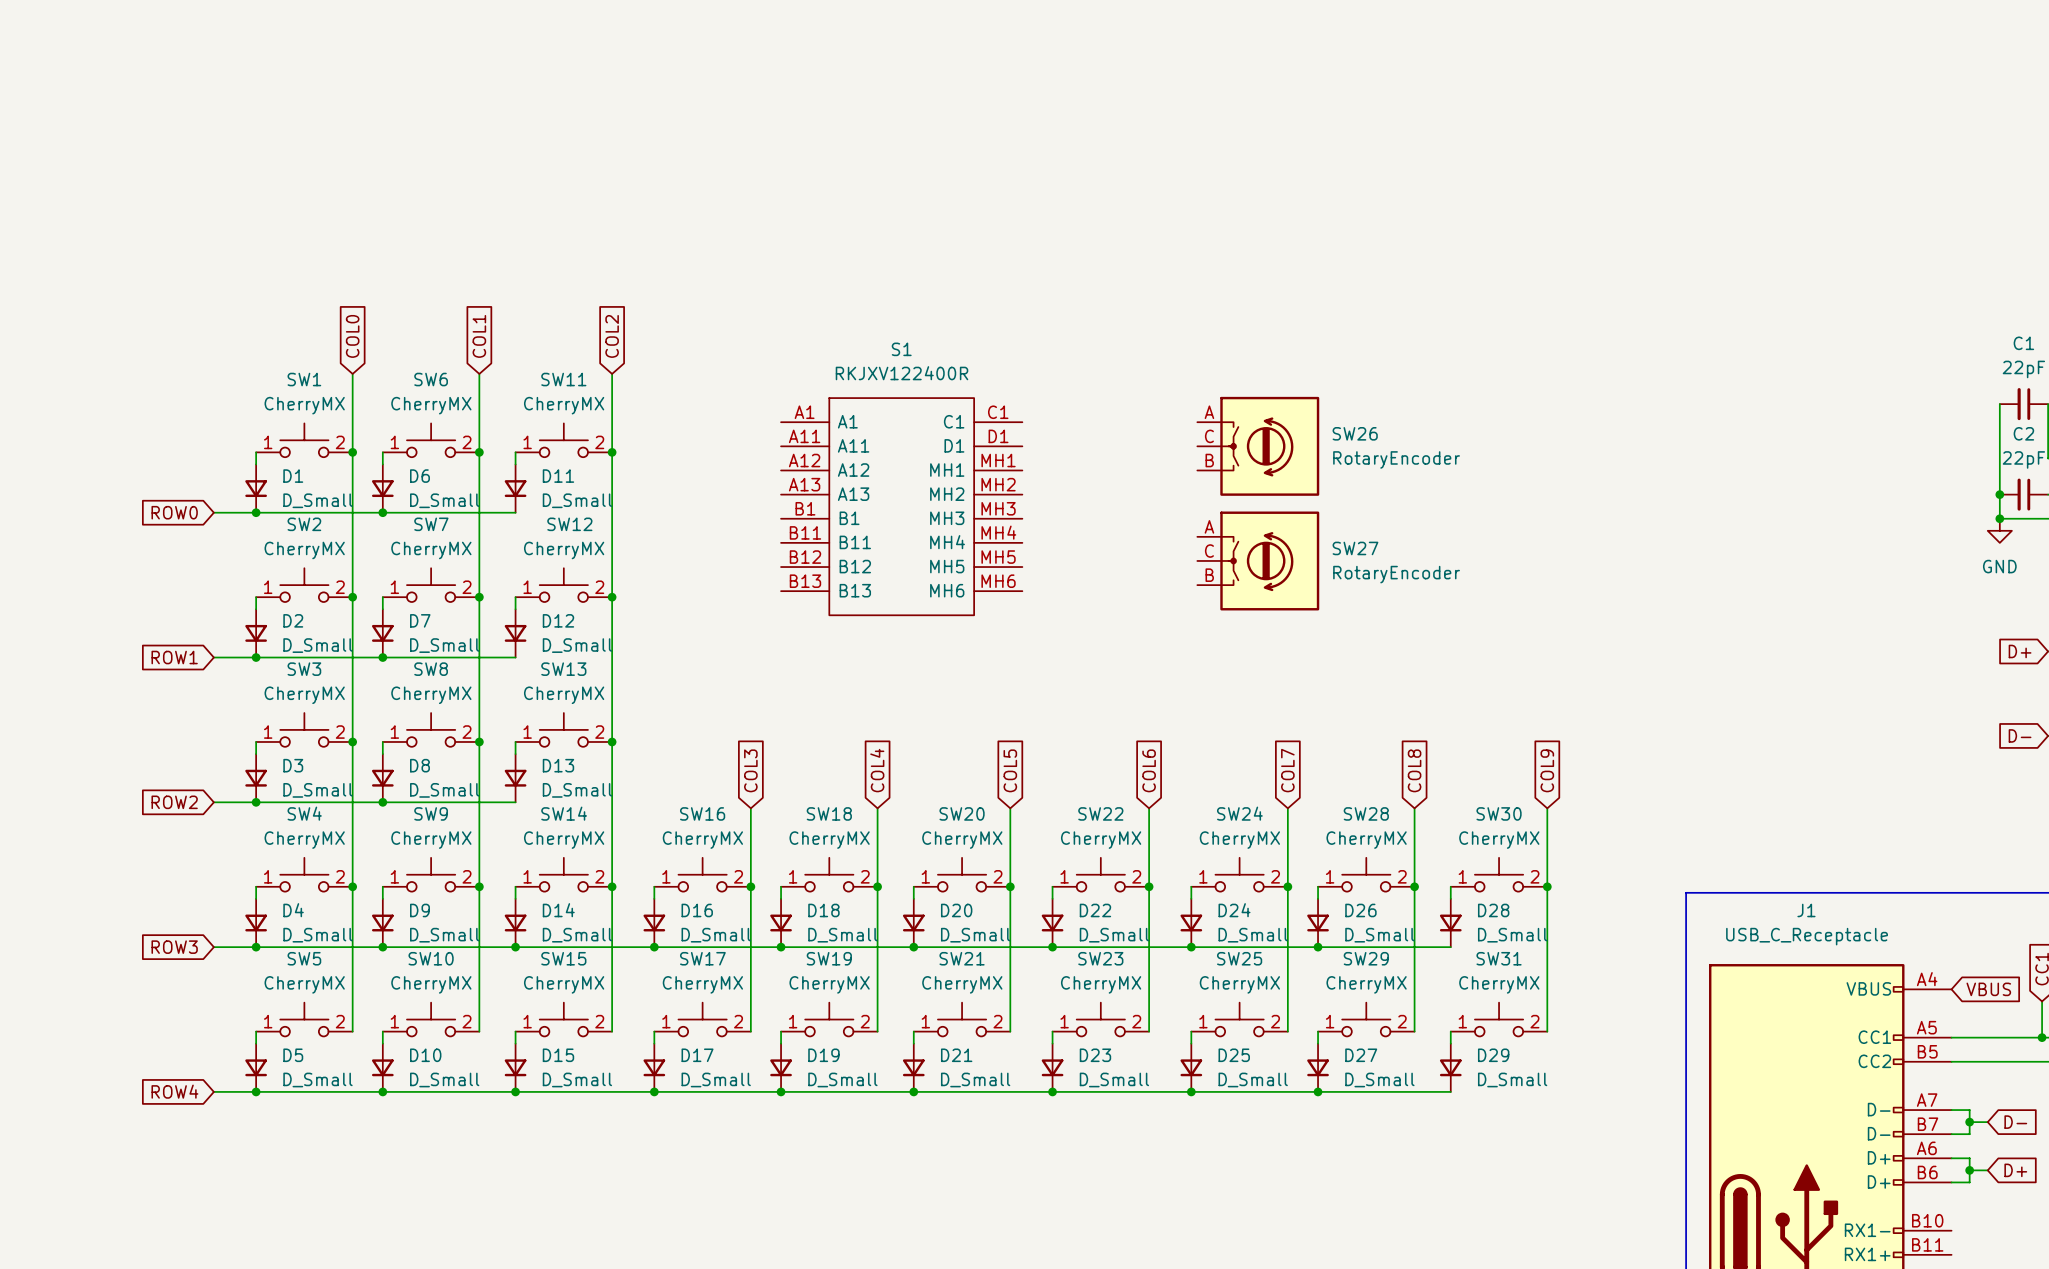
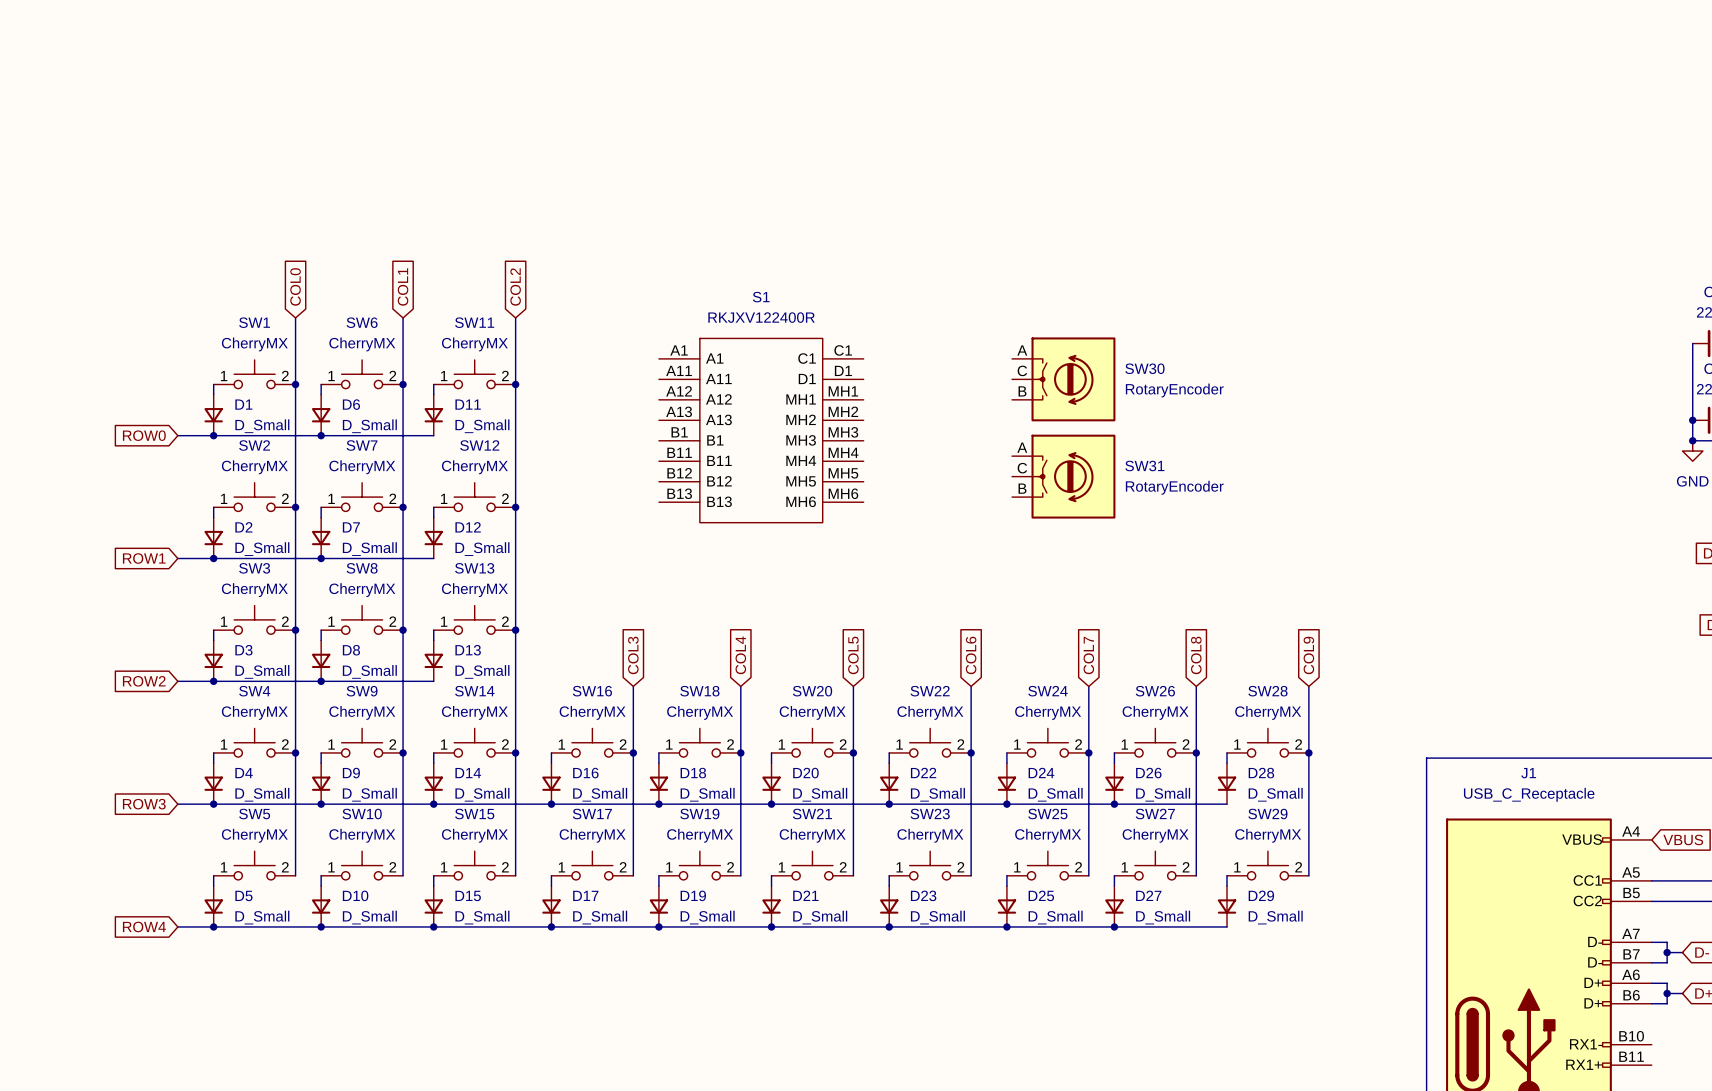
SW26 name: SW26 (1355, 433) -> SW30 (1144, 368)
SW27 name: SW27 (1355, 548) -> SW31 (1144, 465)
SW28 name: SW28 (1366, 813) -> SW26 (1155, 691)
SW30 name: SW30 (1499, 813) -> SW28 (1267, 691)
SW29 name: SW29 (1366, 958) -> SW27 (1155, 814)
SW31 name: SW31 (1499, 958) -> SW29 (1267, 814)

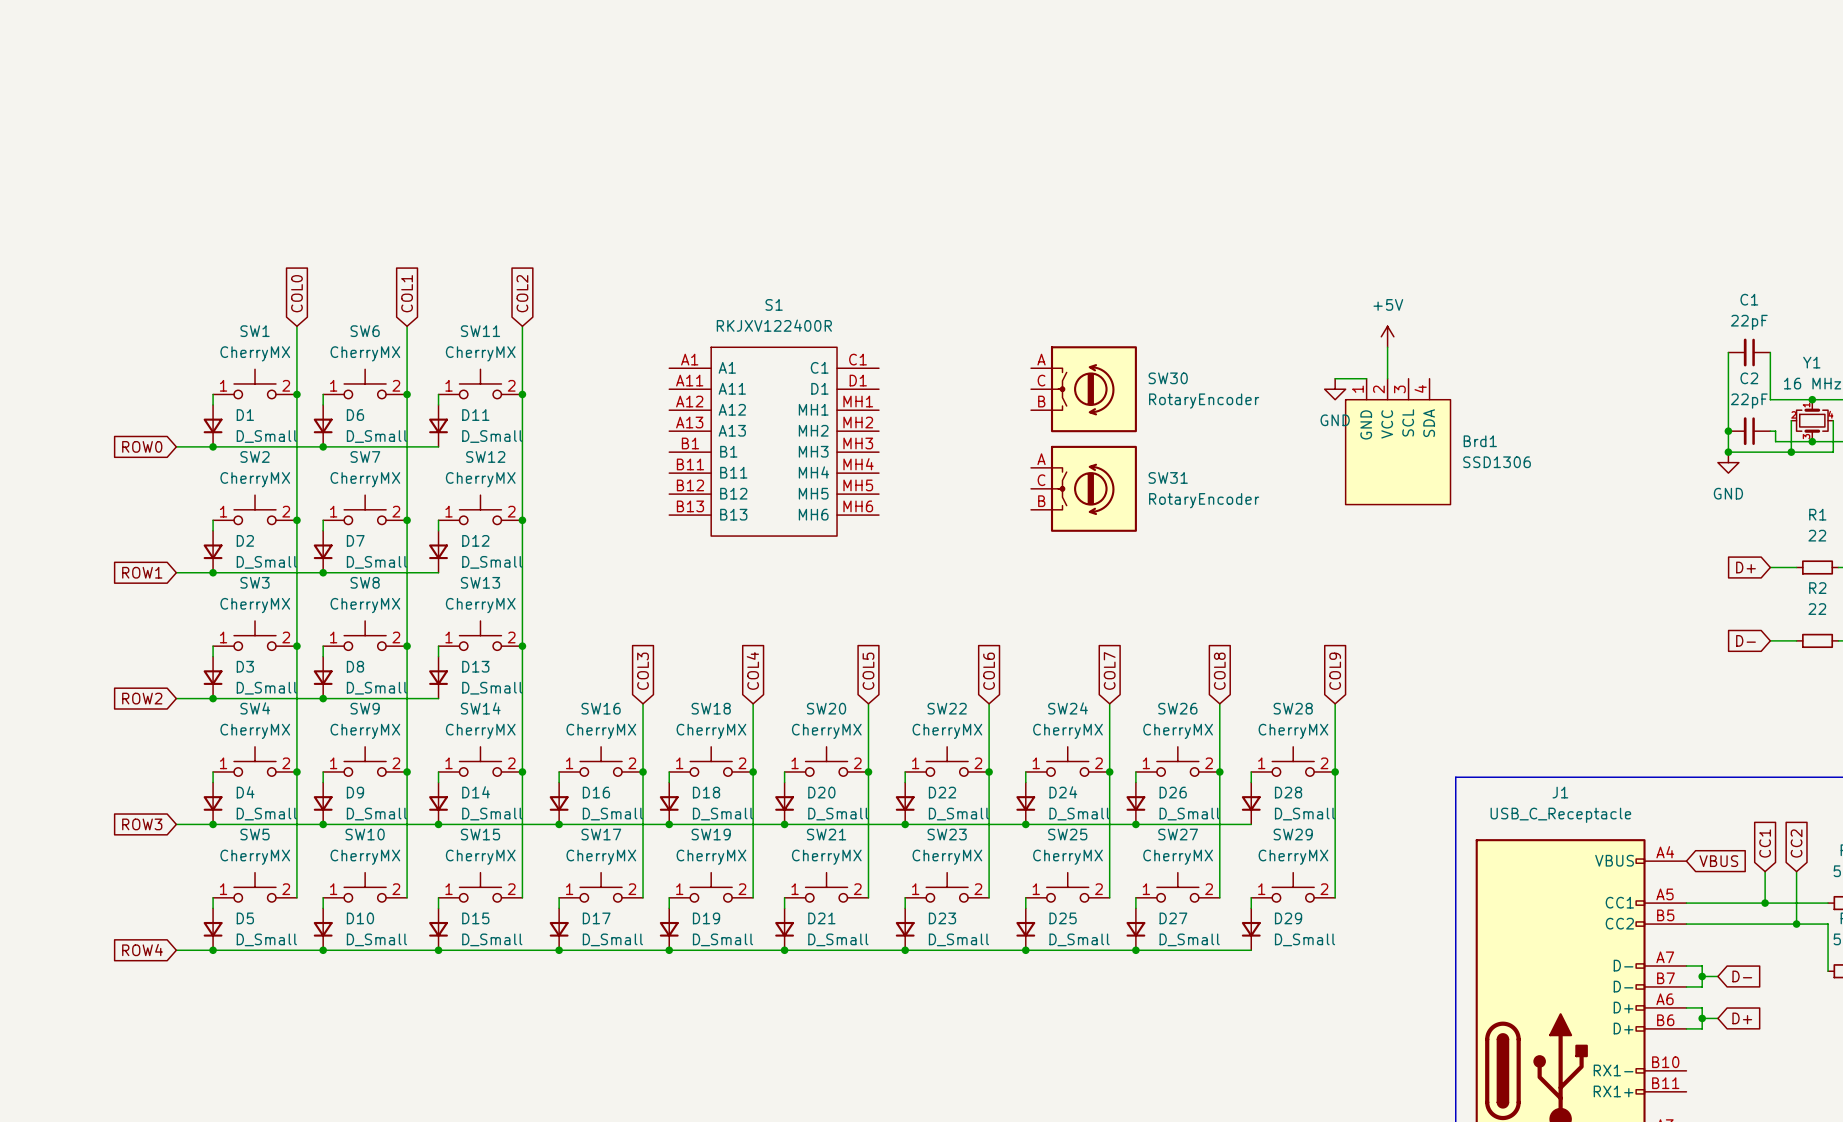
power symbol: none -> +5V (1387, 336)
wire: none -> (1387, 347) (1387, 378)
wire: none -> (1335, 378) (1366, 378)
power symbol: none -> GND (1335, 389)
Brd1: none -> SSD1306 (1398, 441)

